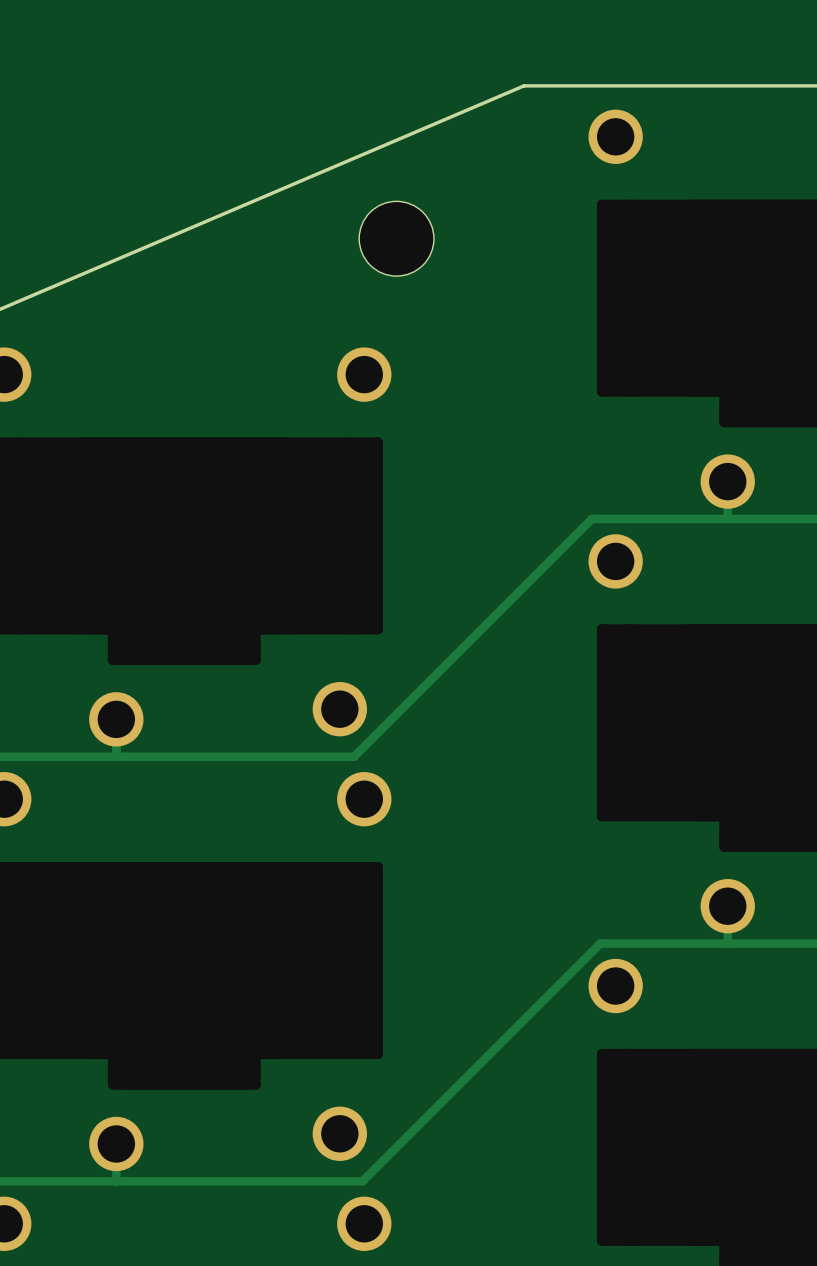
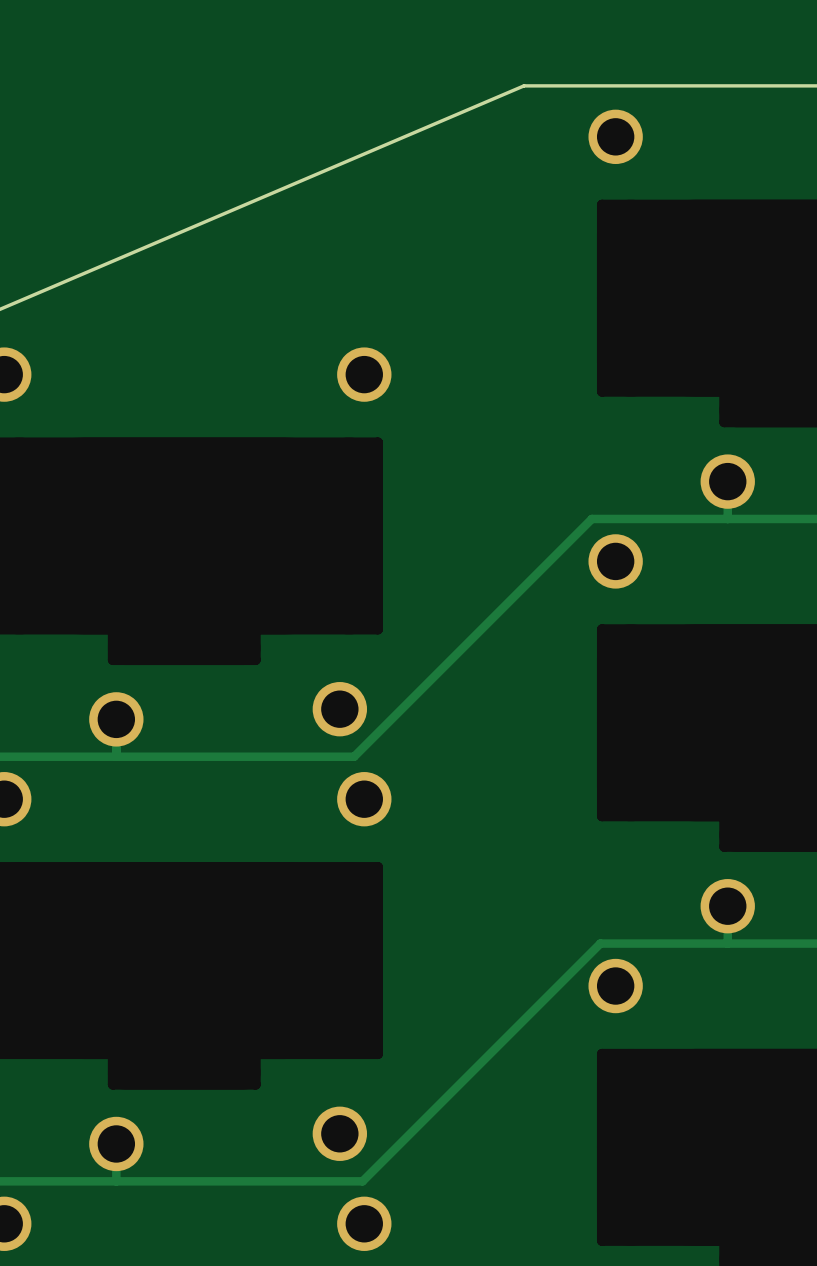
part: (396, 238) -> none

